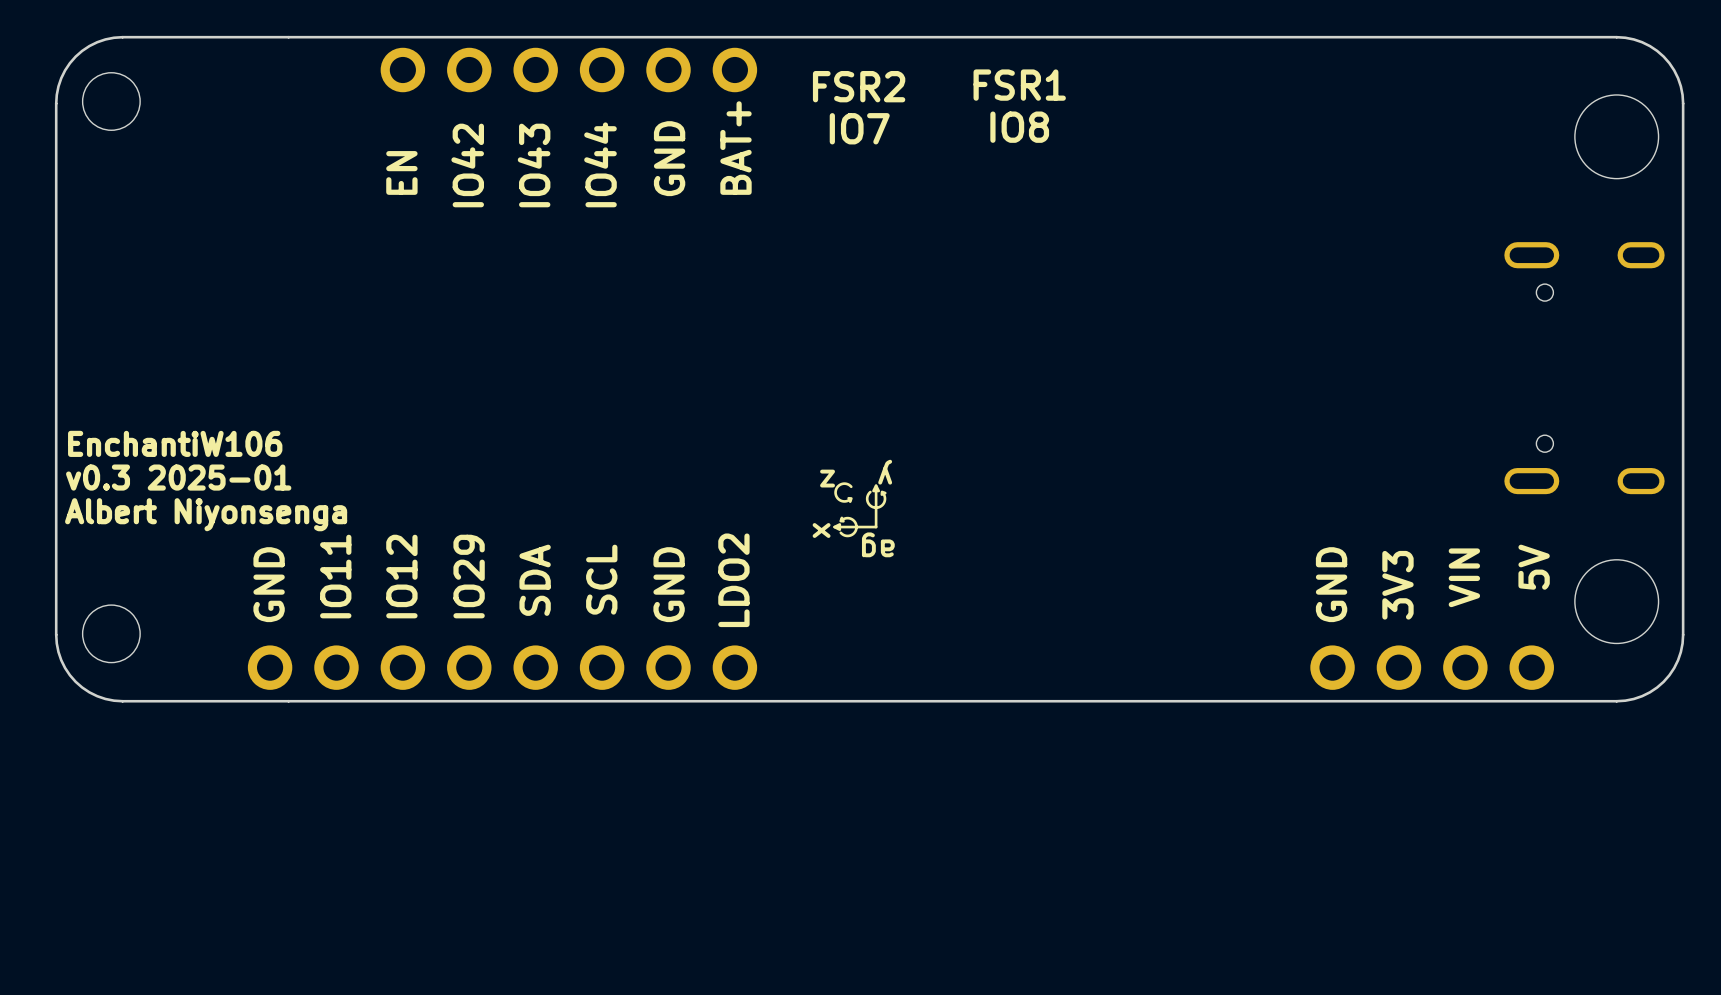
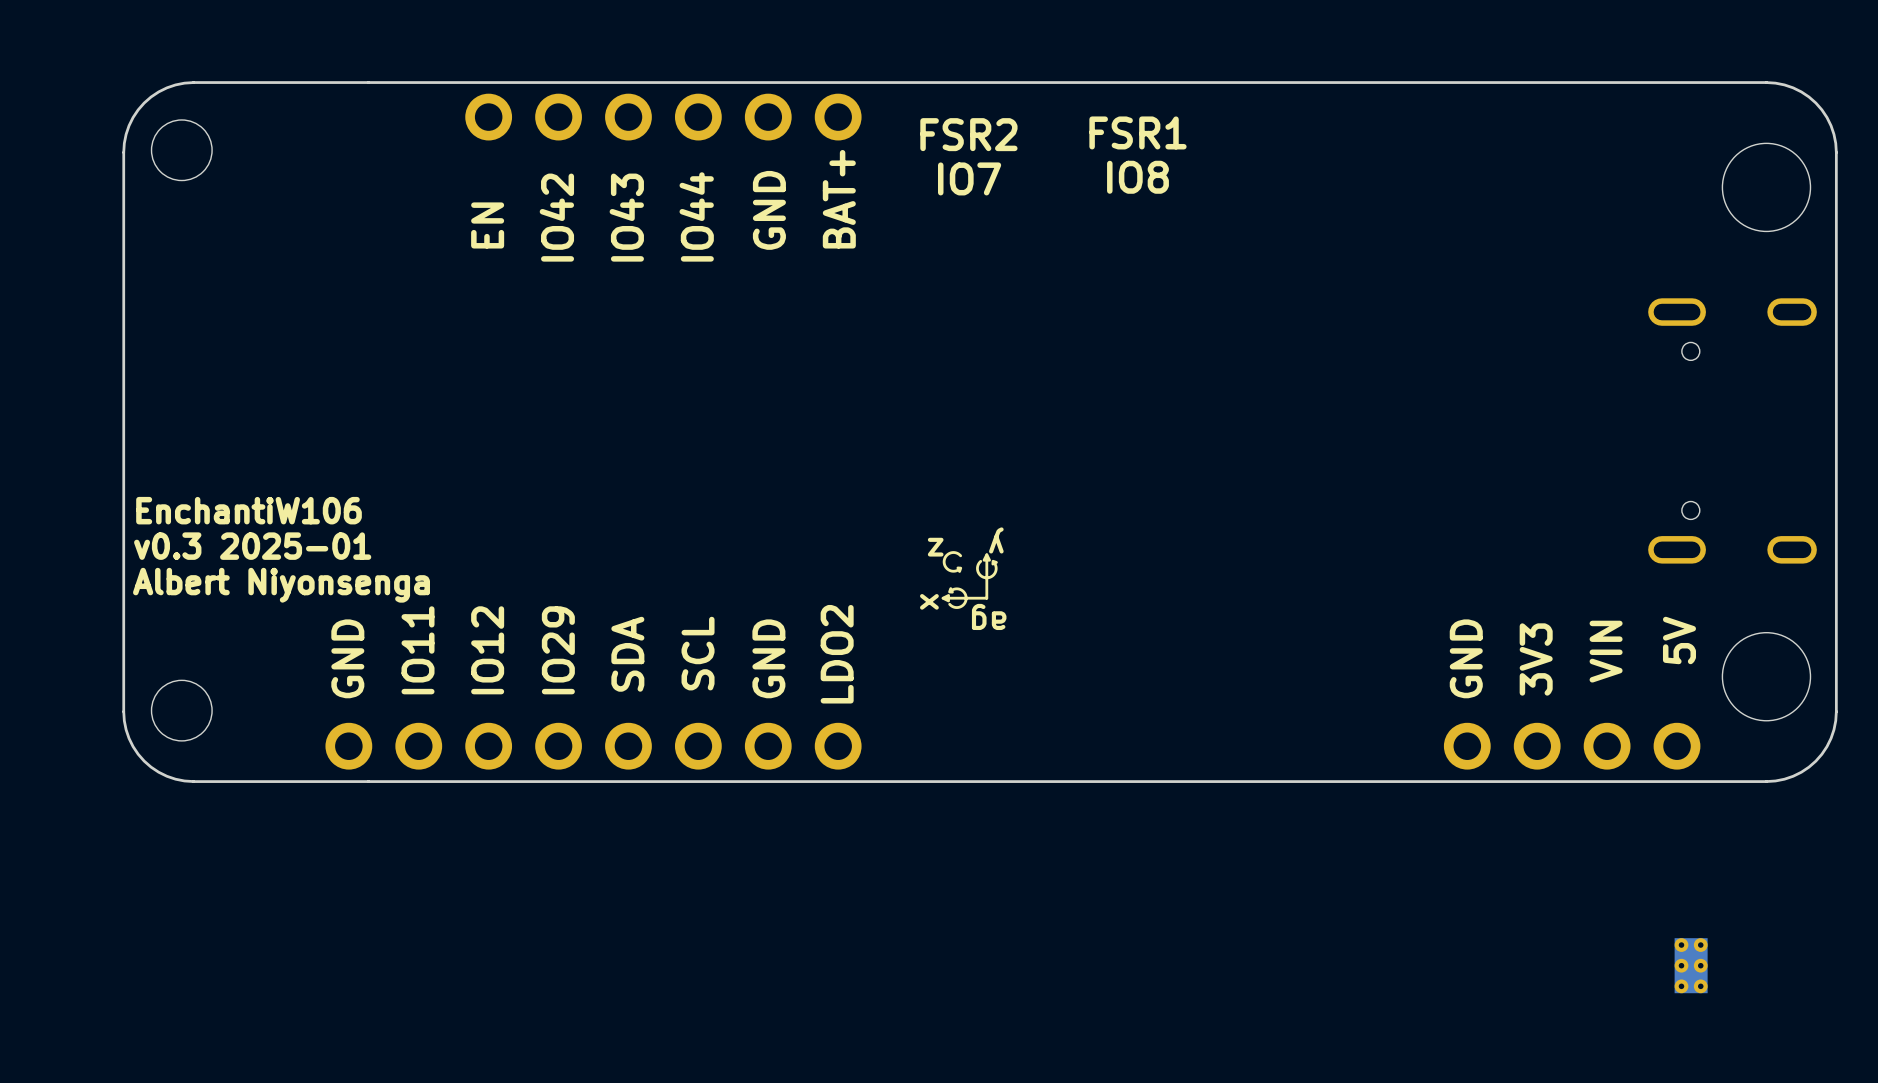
part: none -> (1691, 965)

